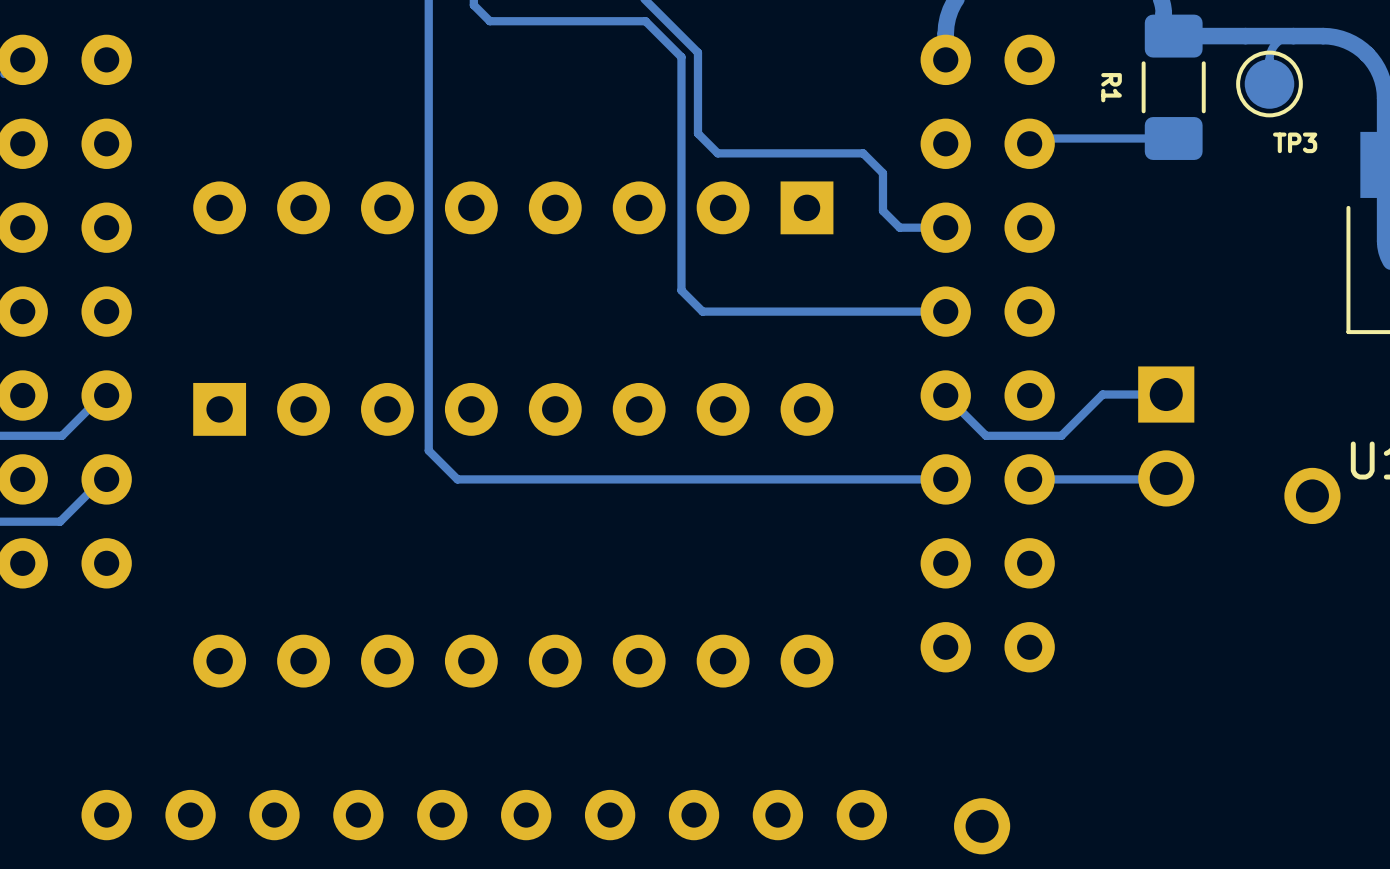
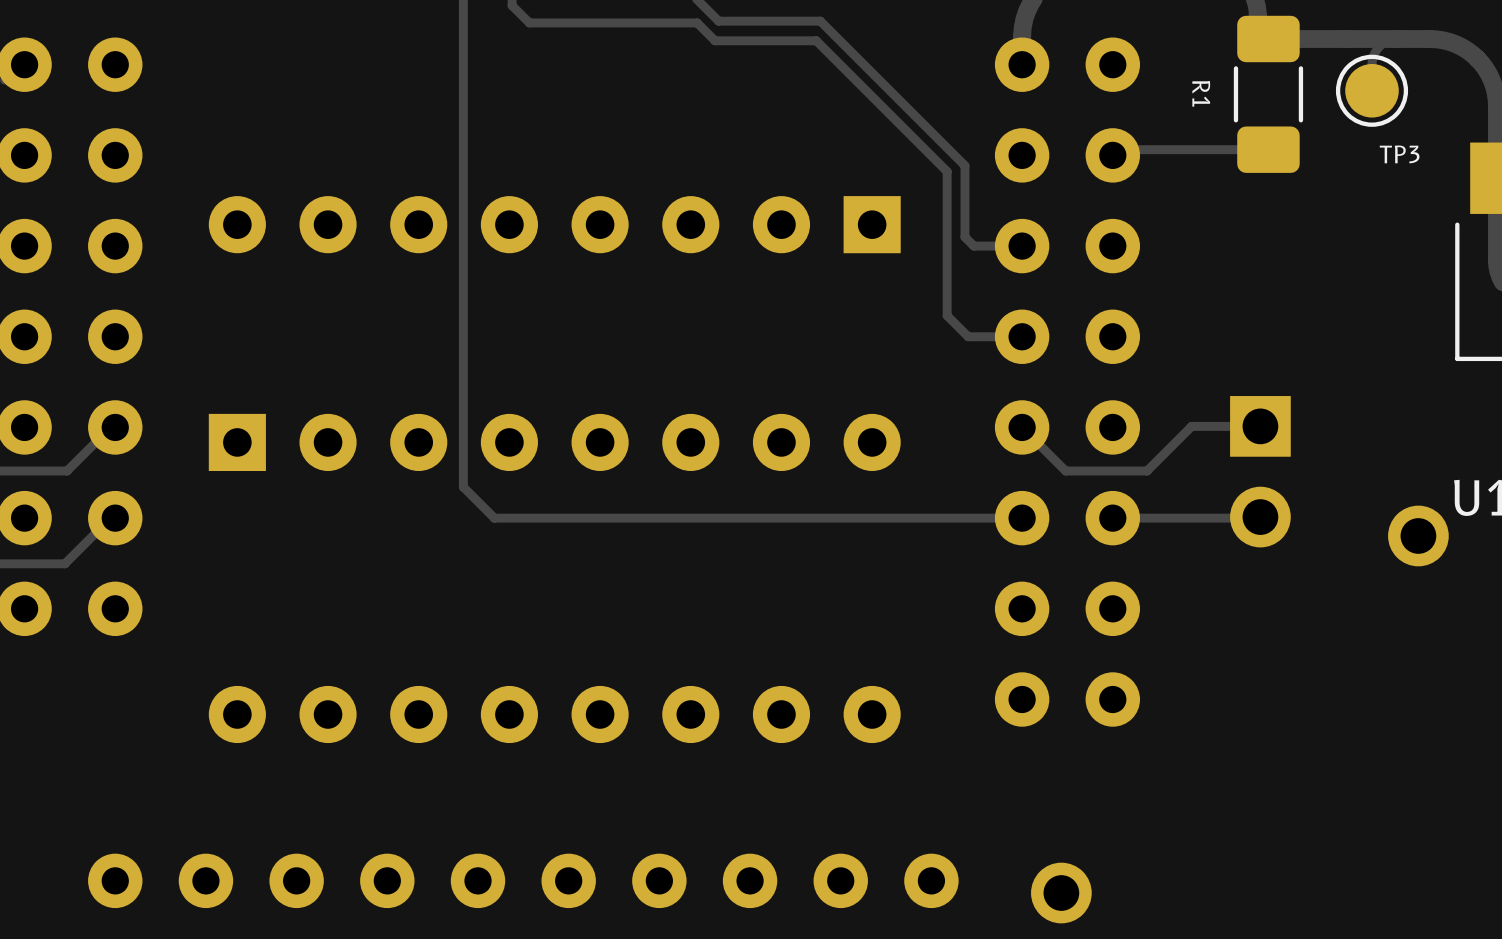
track: (664, 19) (697, 52) (697, 133) (717, 153) (863, 153) (882, 173) (882, 210) (901, 227) -> (718, 21) (820, 21) (964, 165) (964, 237) (973, 246)
track: (645, 21) (681, 57) (681, 290) (702, 311) (895, 311) -> (697, 22) (715, 40) (816, 40) (947, 171) (947, 315) (968, 336)

